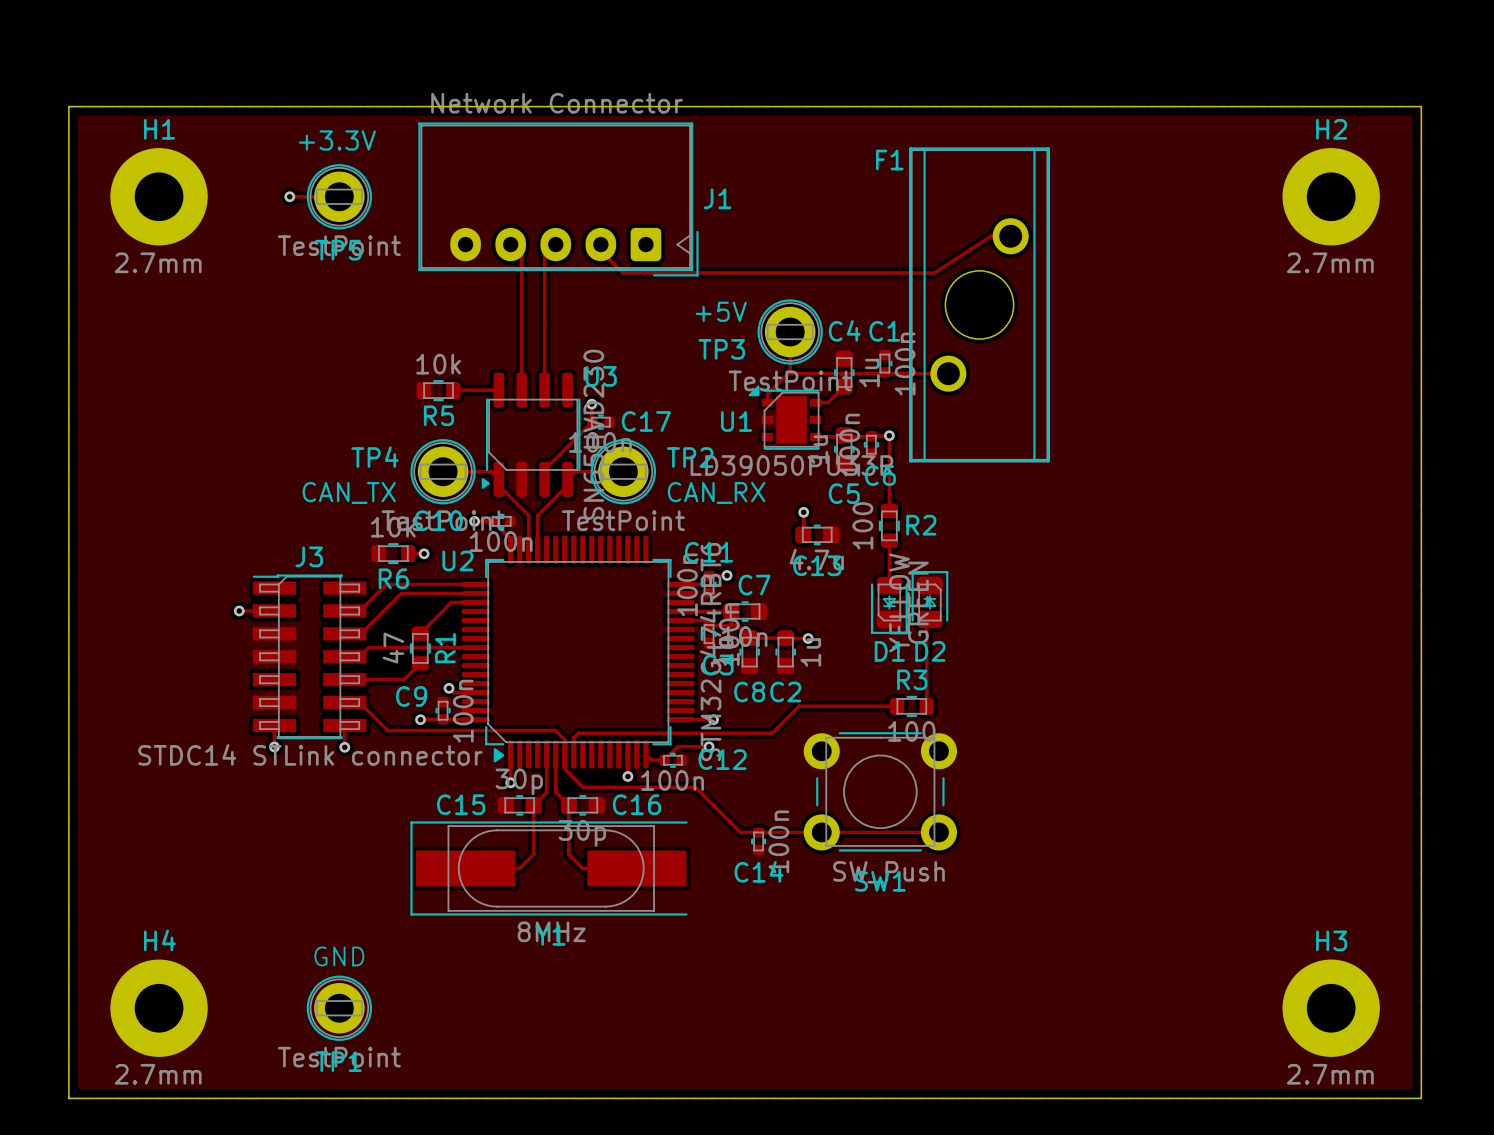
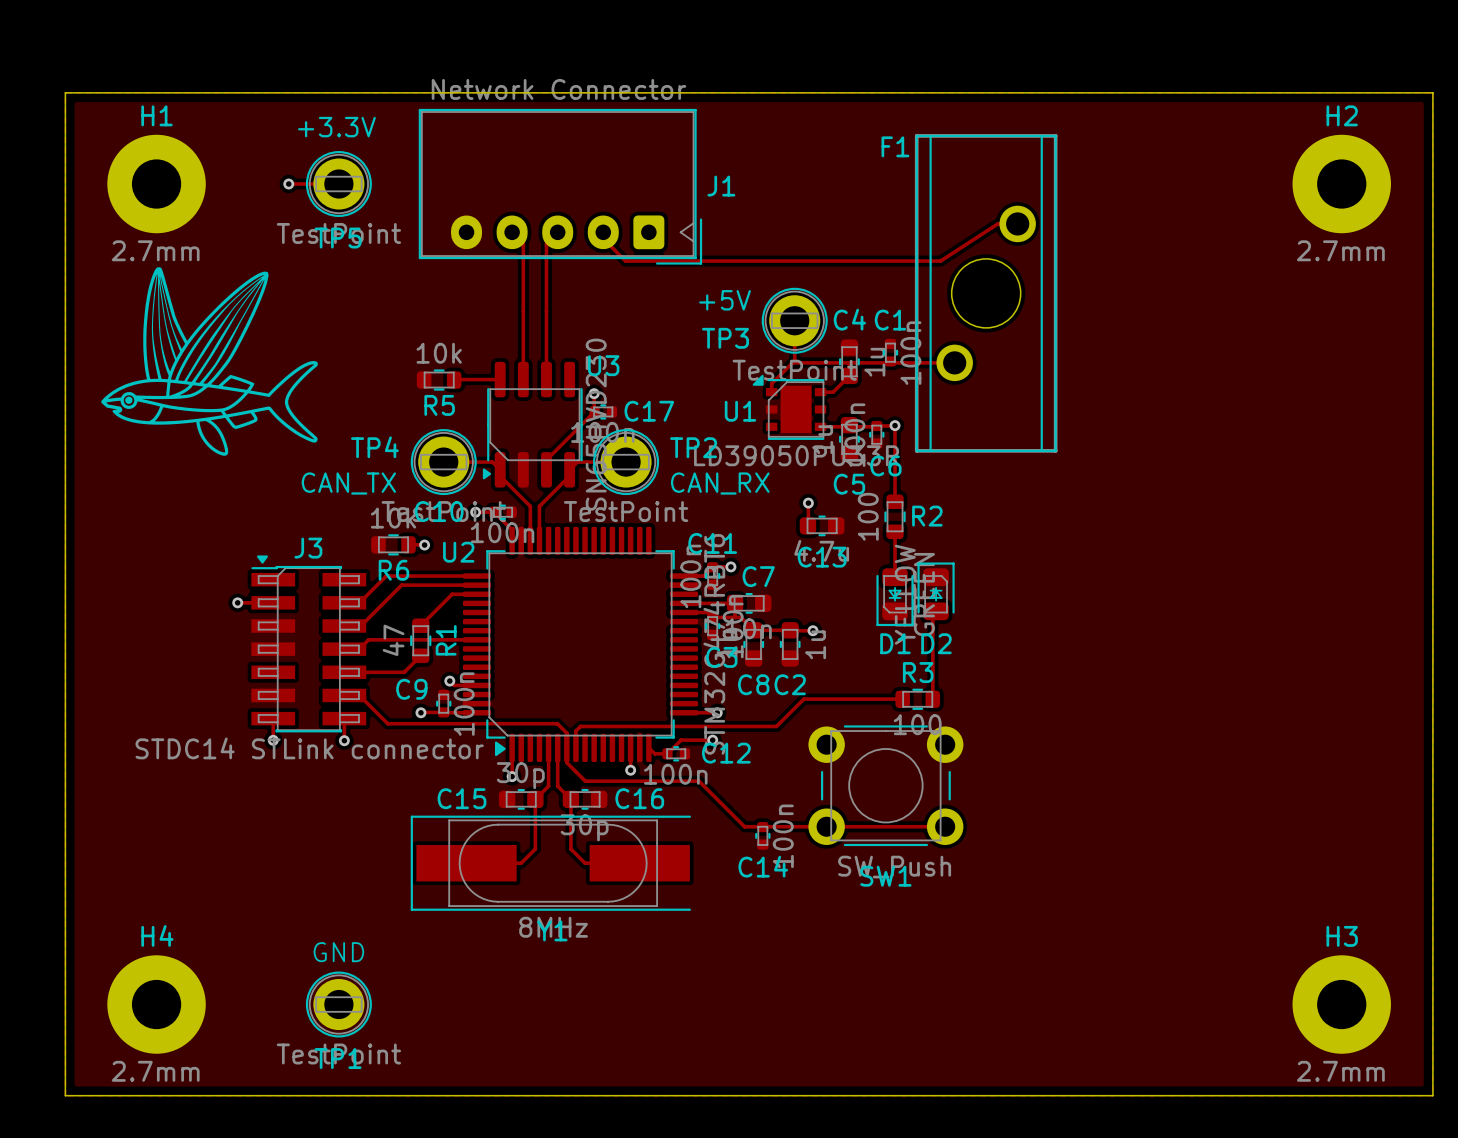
drawing: none -> [101, 267, 318, 456]
J3 footprint: [252, 574, 367, 740] -> [251, 555, 367, 733]

